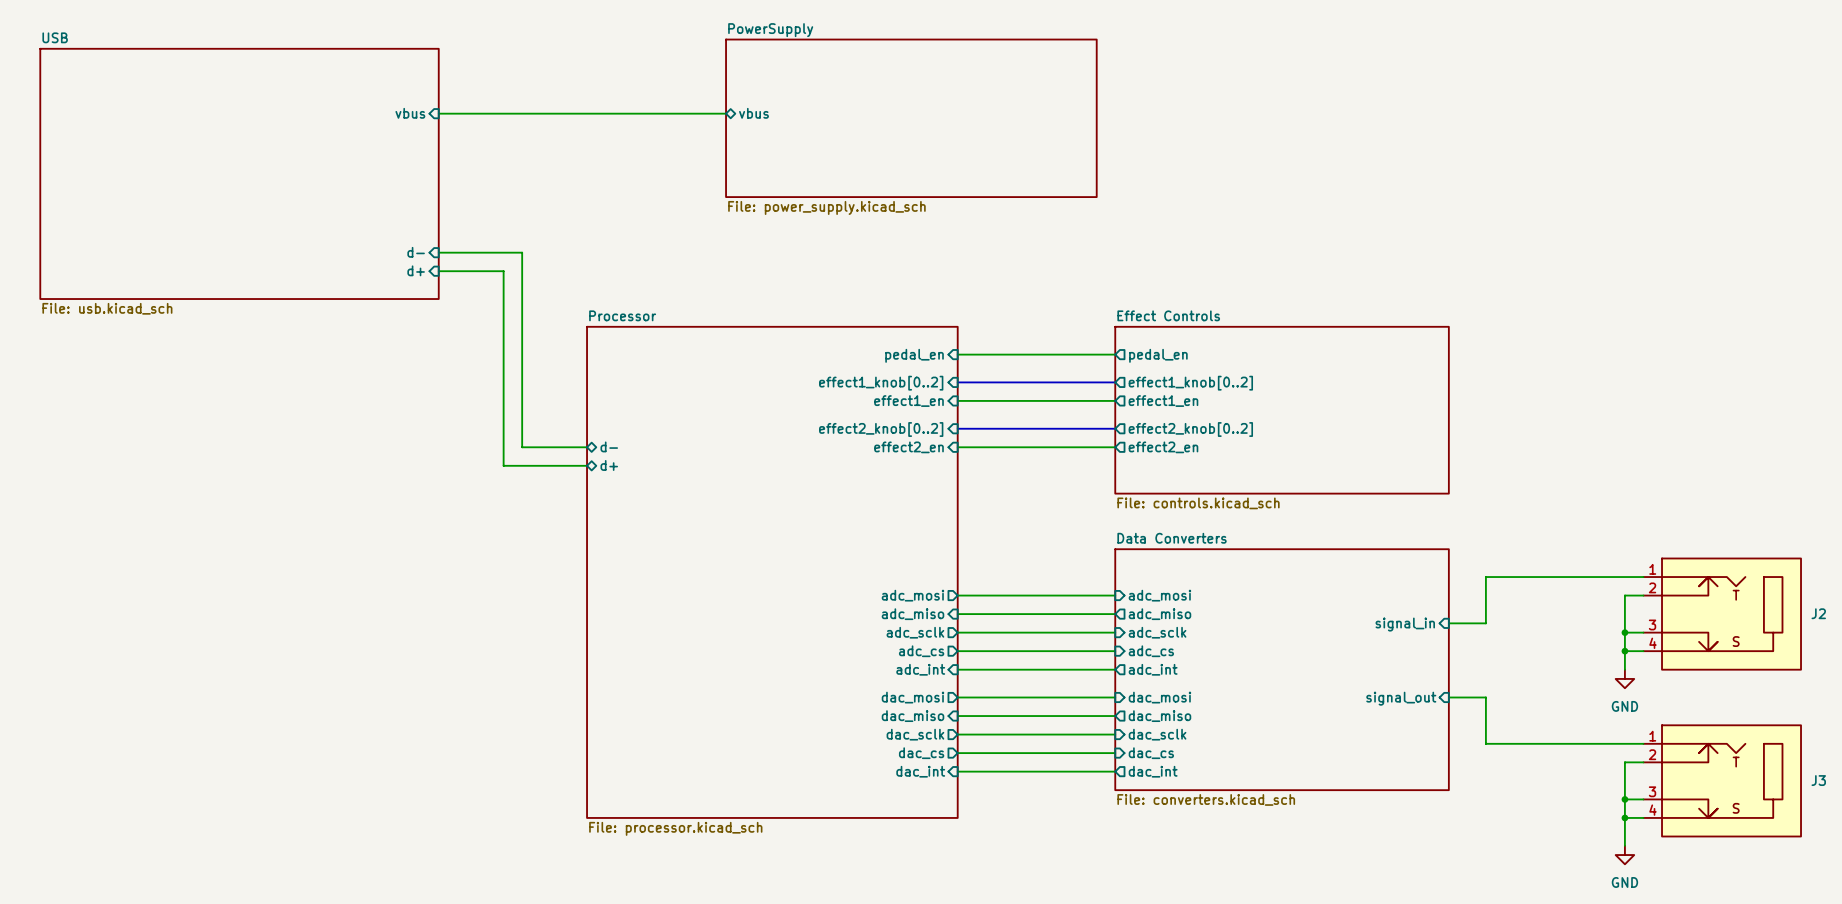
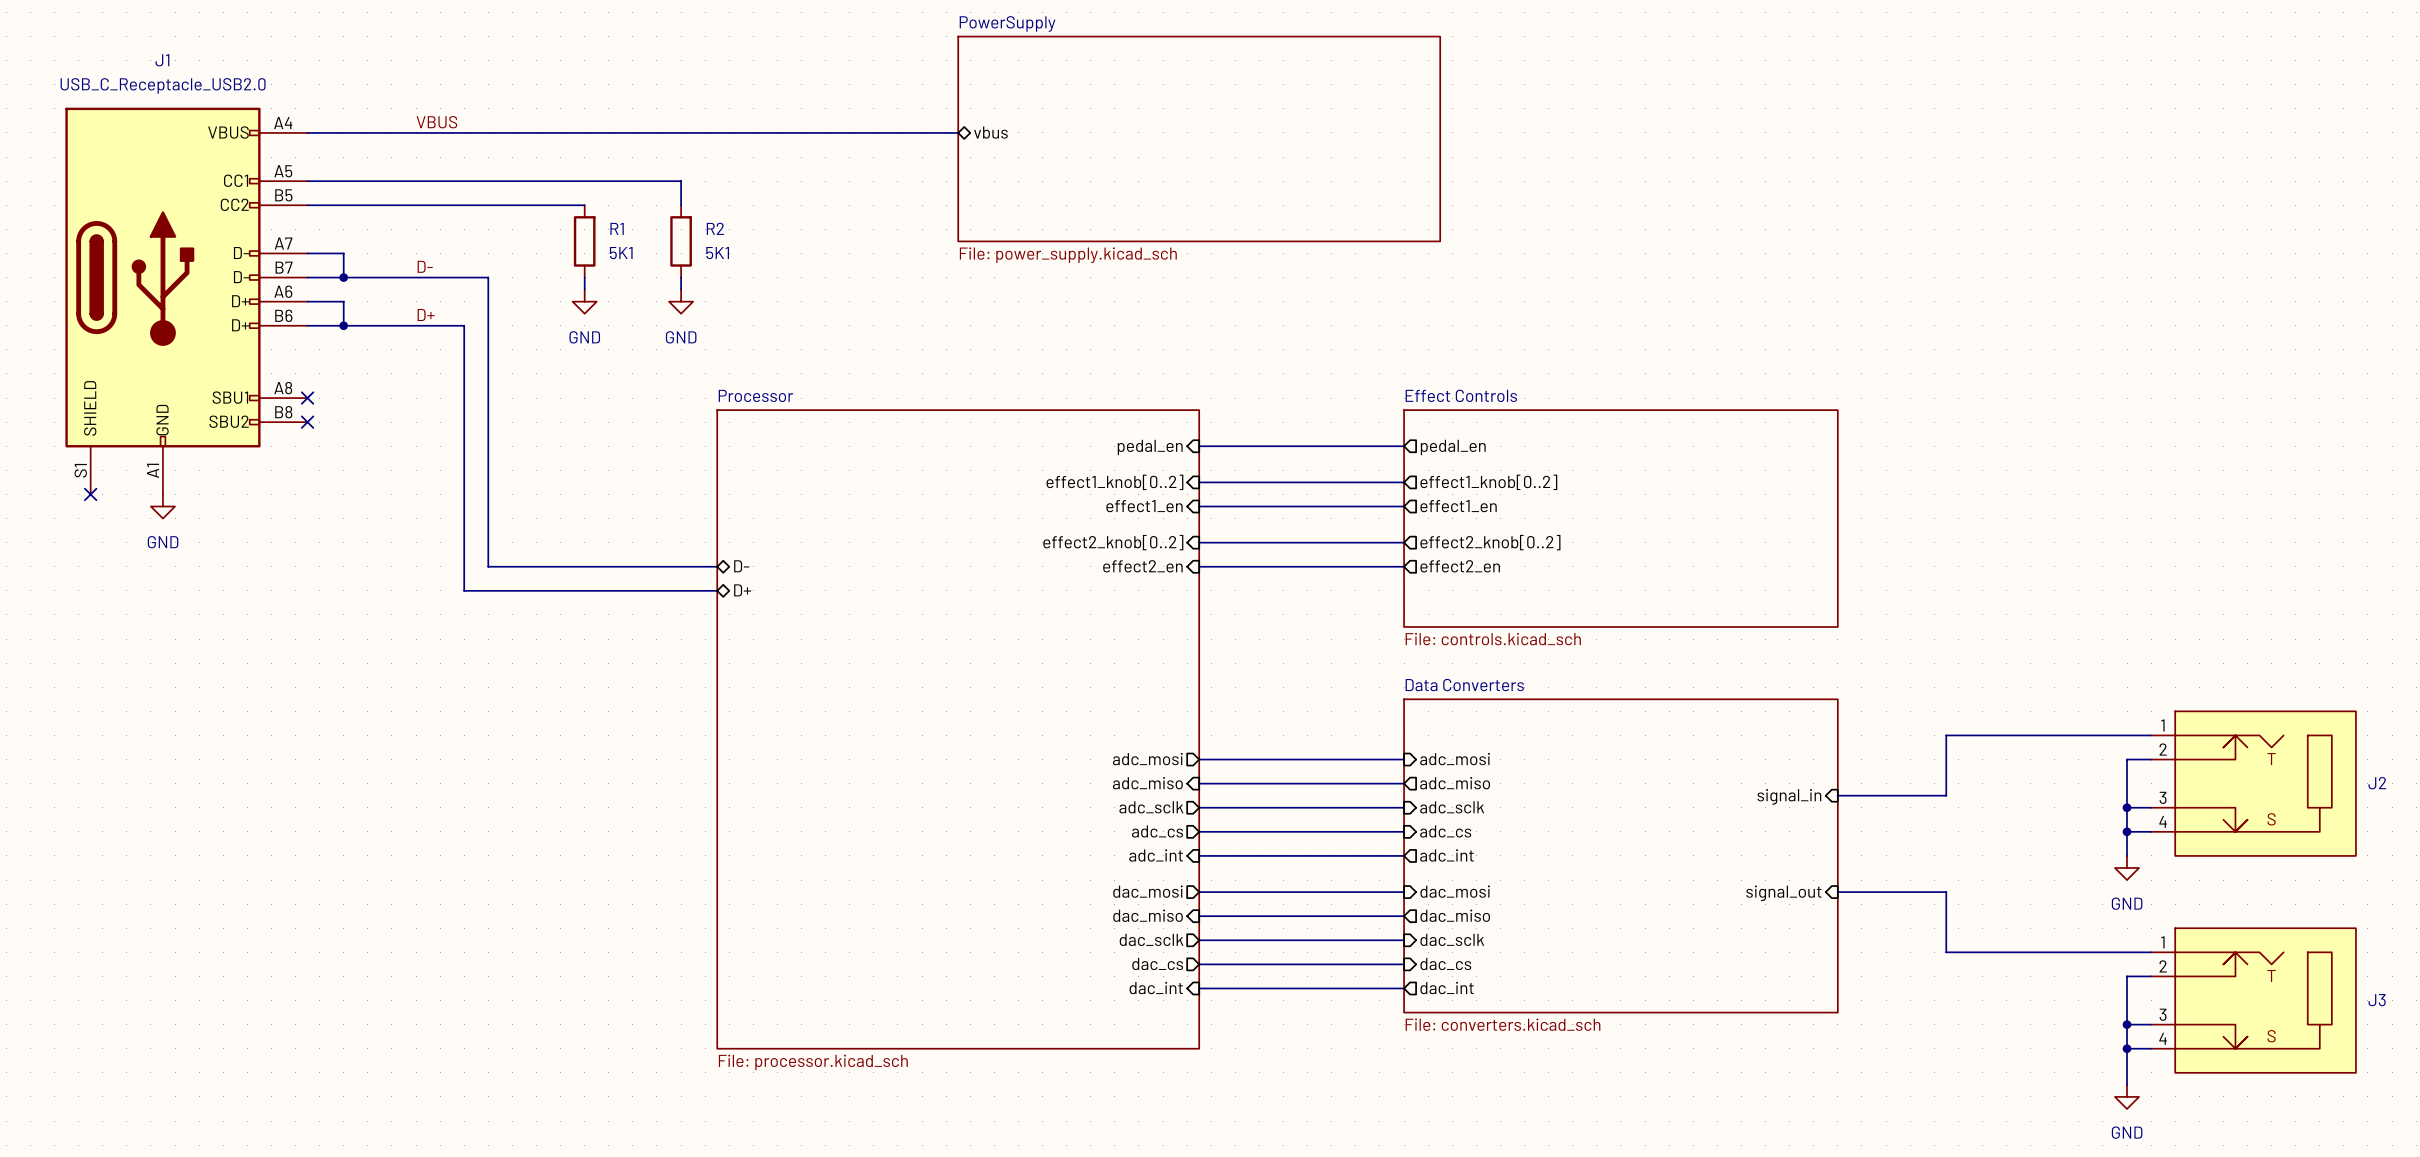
label: none -> VBUS (436, 122)
wire: none -> (307, 132) (584, 132)
sheet pin: vbus (410, 113) -> none
wire: none -> (307, 181) (681, 181) (681, 205)
wire: none -> (307, 205) (584, 205)
sheet USB: File: usb.kicad_sch (239, 173) -> none
R1: none -> 5K1 (584, 241)
R2: none -> 5K1 (681, 241)
wire: none -> (307, 253) (343, 253) (343, 277)
label: none -> D- (425, 266)
junction: none -> (343, 277)
wire: none -> (681, 277) (681, 289)
J1: none -> USB_C_Receptacle_USB2.0 (186, 301)
wire: none -> (307, 301) (343, 301) (343, 325)
power symbol: none -> GND (584, 301)
power symbol: none -> GND (681, 301)
sheet pin: d- (416, 252) -> none
wire: (438, 252) (522, 252) (522, 447) -> (307, 277) (488, 277) (488, 566) (693, 566)
label: none -> D+ (426, 315)
junction: none -> (343, 325)
sheet pin: d+ (416, 270) -> none
wire: (438, 271) (503, 271) (503, 465) -> (307, 325) (464, 325) (464, 590) (669, 590)
no-connect mark: none -> (307, 398)
no-connect mark: none -> (307, 422)
wire: (1068, 354) (1115, 354) -> (1199, 446) (1259, 446)
sheet pin position: pedal_en (914, 355) -> pedal_en (1150, 447)
sheet pin position: pedal_en (1158, 355) -> pedal_en (1453, 447)
bus: (1068, 382) (1115, 382) -> (1199, 482) (1259, 482)
sheet pin position: effect1_knob[0..2] (881, 383) -> effect1_knob[0..2] (1114, 482)
sheet pin position: effect1_knob[0..2] (1190, 383) -> effect1_knob[0..2] (1488, 482)
no-connect mark: none -> (90, 494)
power symbol: none -> GND (162, 506)
wire: (1068, 400) (1115, 400) -> (1199, 506) (1259, 506)
sheet pin position: effect1_en (909, 401) -> effect1_en (1144, 506)
sheet pin position: effect1_en (1163, 401) -> effect1_en (1458, 506)
sheet Effect Controls position: (1282, 410) -> (1620, 518)
bus: (1068, 428) (1115, 428) -> (1199, 542) (1259, 542)
sheet pin position: effect2_knob[0..2] (881, 429) -> effect2_knob[0..2] (1113, 542)
sheet pin position: effect2_knob[0..2] (1190, 429) -> effect2_knob[0..2] (1490, 542)
sheet pin: none -> D- (741, 566)
sheet pin: d- (609, 446) -> none
wire: (540, 447) (587, 447) -> none
sheet pin position: effect2_en (909, 447) -> effect2_en (1142, 566)
wire: (1068, 447) (1115, 447) -> (1199, 566) (1259, 566)
sheet pin position: effect2_en (1163, 447) -> effect2_en (1460, 566)
wire: (540, 465) (587, 465) -> none
sheet pin: none -> D+ (742, 590)
sheet pin: d+ (609, 465) -> none
sheet Processor position: (772, 572) -> (958, 729)
sheet pin position: adc_mosi (913, 595) -> adc_mosi (1147, 759)
wire: (1068, 595) (1115, 595) -> (1199, 759) (1259, 759)
sheet pin position: adc_mosi (1159, 595) -> adc_mosi (1455, 759)
sheet pin position: adc_miso (913, 614) -> adc_miso (1147, 783)
wire: (1068, 614) (1115, 614) -> (1199, 783) (1259, 783)
sheet pin position: adc_miso (1159, 614) -> adc_miso (1455, 783)
wire: none -> (1837, 795) (1898, 795)
sheet pin position: signal_in (1405, 624) -> signal_in (1789, 796)
sheet pin position: adc_sclk (915, 632) -> adc_sclk (1151, 807)
wire: (1068, 632) (1115, 632) -> (1199, 807) (1259, 807)
sheet pin position: adc_sclk (1157, 632) -> adc_sclk (1452, 807)
sheet pin position: adc_cs (921, 651) -> adc_cs (1157, 831)
wire: (1068, 651) (1115, 651) -> (1199, 831) (1259, 831)
sheet pin position: adc_cs (1151, 651) -> adc_cs (1445, 831)
sheet pin position: adc_int (920, 669) -> adc_int (1156, 855)
wire: (1068, 669) (1115, 669) -> (1199, 855) (1259, 855)
sheet pin position: adc_int (1153, 669) -> adc_int (1446, 855)
sheet Data Converters position: (1282, 669) -> (1620, 855)
sheet pin position: dac_mosi (913, 697) -> dac_mosi (1147, 891)
wire: (1068, 697) (1115, 697) -> (1199, 892) (1259, 892)
sheet pin position: dac_mosi (1159, 697) -> dac_mosi (1455, 891)
wire: none -> (1837, 892) (1898, 892)
sheet pin position: signal_out (1401, 698) -> signal_out (1783, 893)
sheet pin position: dac_miso (913, 716) -> dac_miso (1148, 915)
wire: (1068, 716) (1115, 716) -> (1199, 916) (1259, 916)
sheet pin position: dac_miso (1159, 716) -> dac_miso (1455, 915)
sheet pin position: dac_sclk (915, 734) -> dac_sclk (1151, 939)
wire: (1068, 734) (1115, 734) -> (1199, 940) (1259, 940)
sheet pin position: dac_sclk (1157, 734) -> dac_sclk (1452, 939)
sheet pin position: dac_cs (921, 753) -> dac_cs (1157, 963)
wire: (1068, 753) (1115, 753) -> (1199, 964) (1259, 964)
sheet pin position: dac_cs (1151, 753) -> dac_cs (1445, 963)
sheet pin position: dac_int (920, 771) -> dac_int (1156, 988)
wire: (1068, 771) (1115, 771) -> (1199, 988) (1259, 988)
sheet pin position: dac_int (1153, 771) -> dac_int (1447, 988)

